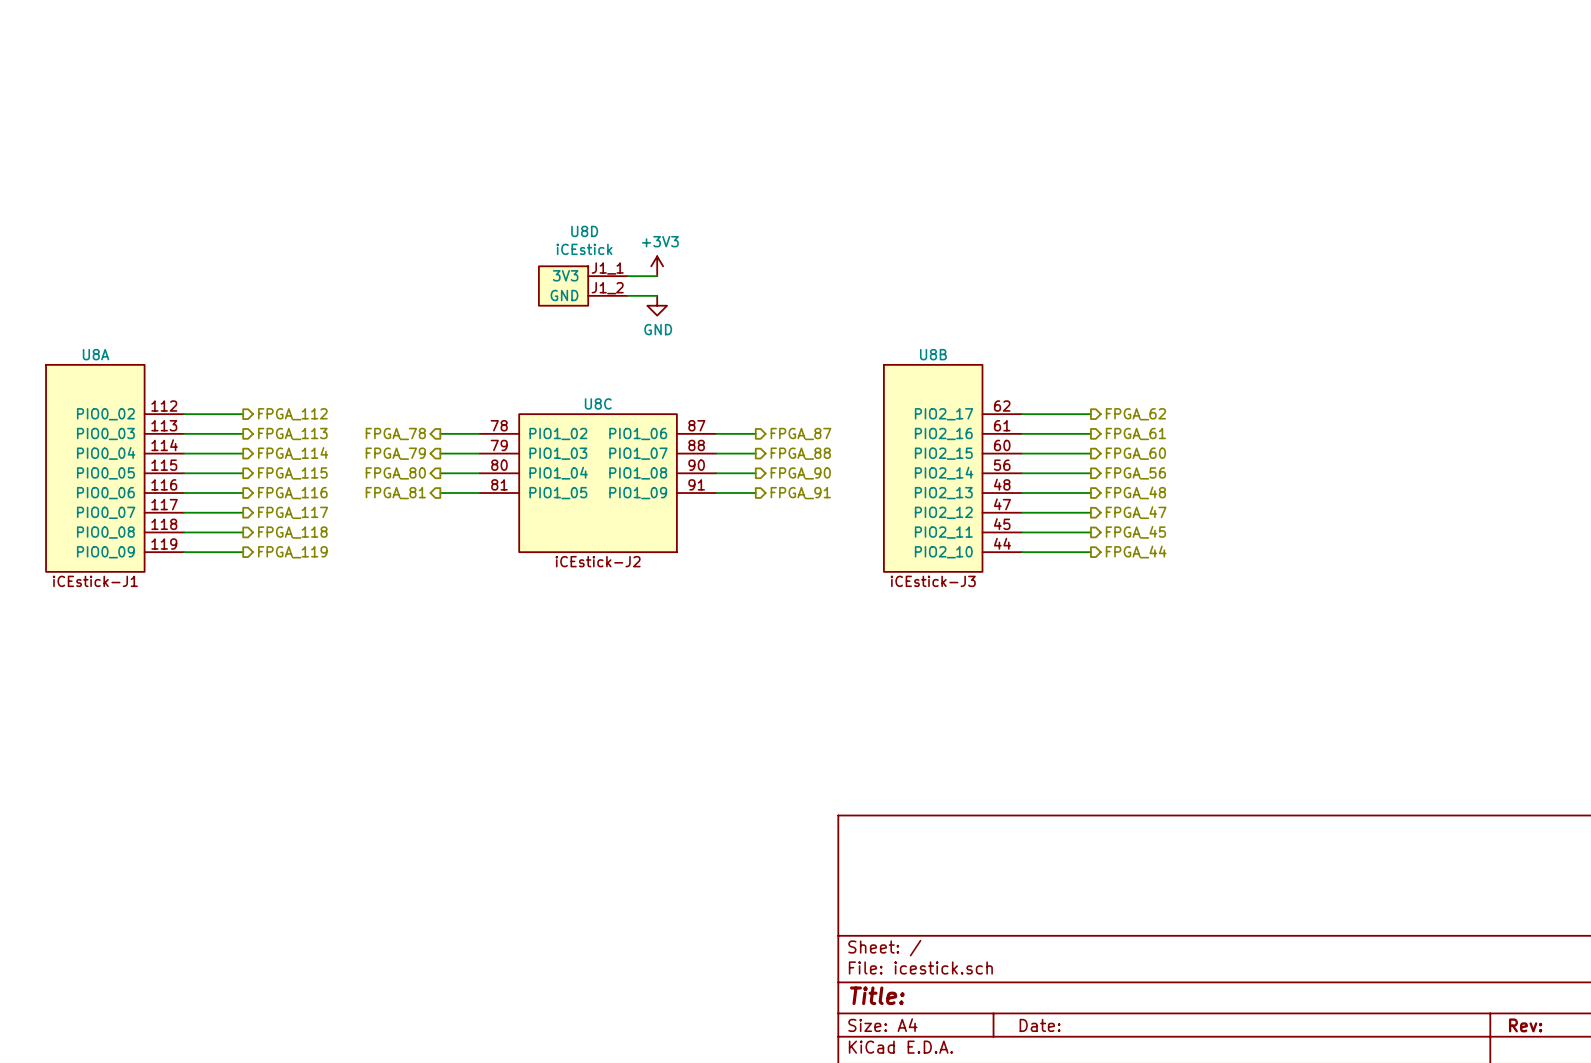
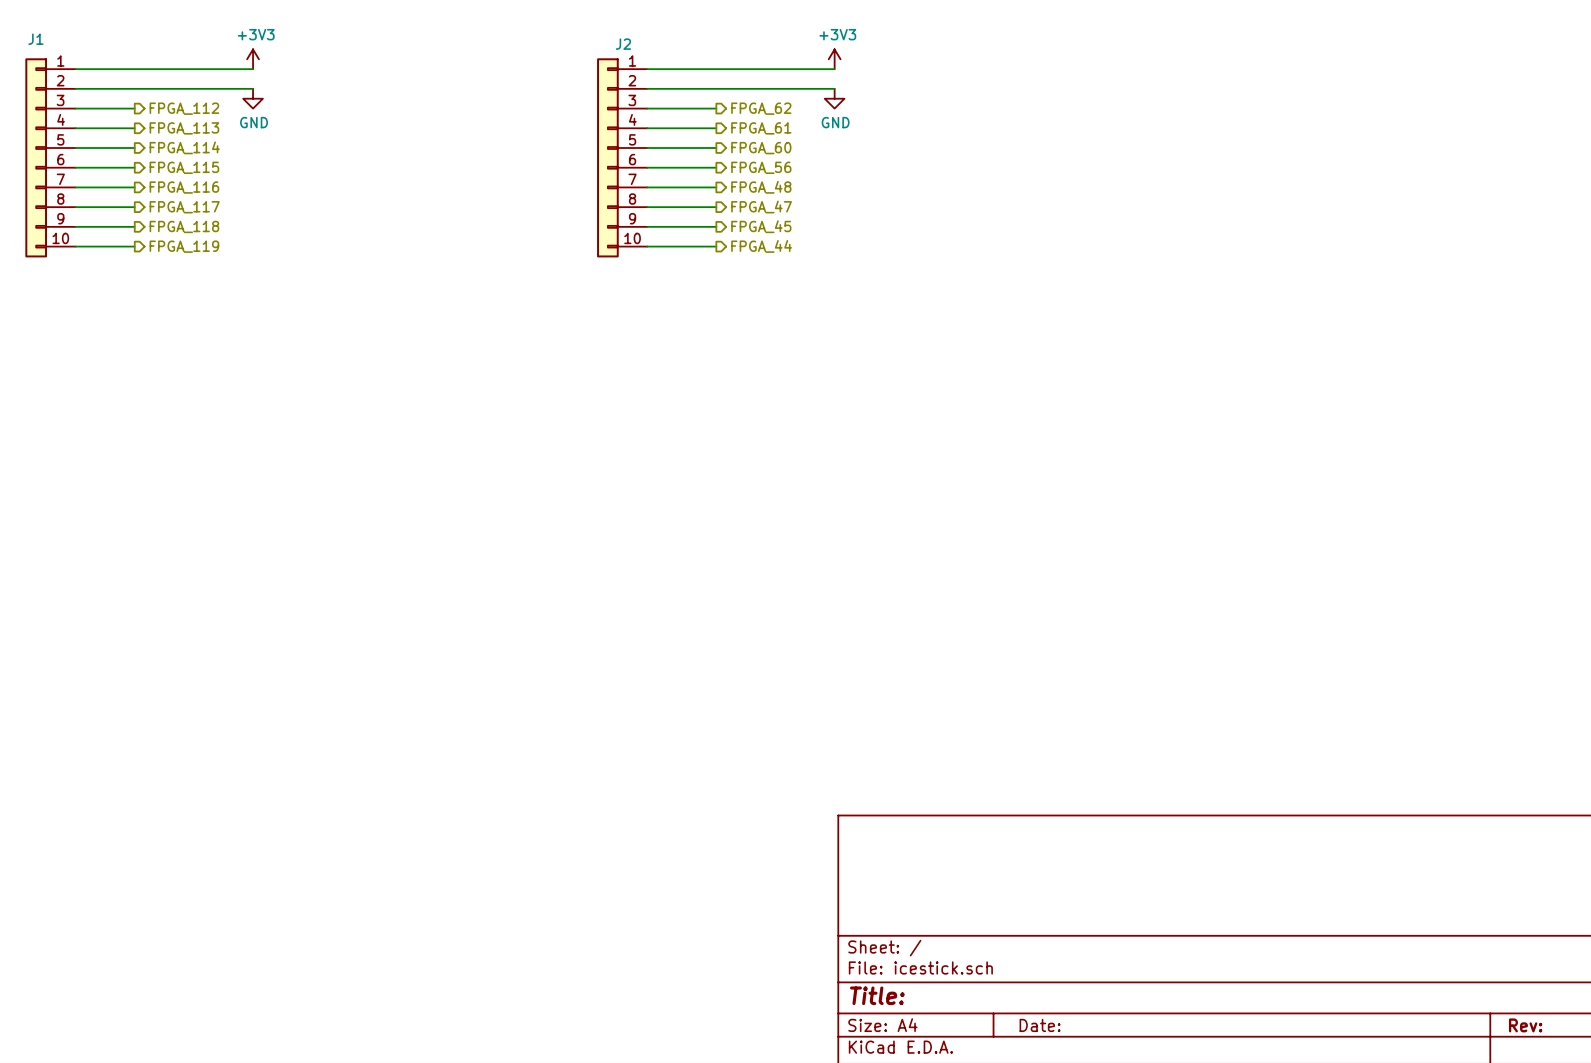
power symbol: none -> +3V3 (253, 59)
power symbol: none -> +3V3 (834, 59)
wire: none -> (75, 69) (253, 69)
wire: none -> (647, 69) (834, 69)
wire: none -> (75, 88) (253, 88)
wire: none -> (647, 88) (834, 88)
power symbol: none -> GND (253, 98)
power symbol: none -> GND (834, 98)
wire: none -> (75, 108) (134, 108)
hierarchical label: none -> FPGA_112 (184, 108)
wire: none -> (647, 108) (716, 108)
hierarchical label: none -> FPGA_62 (761, 108)
wire: none -> (75, 128) (134, 128)
hierarchical label: none -> FPGA_113 (184, 128)
wire: none -> (647, 128) (716, 128)
hierarchical label: none -> FPGA_61 (761, 128)
hierarchical label: none -> FPGA_114 (184, 147)
wire: none -> (75, 148) (134, 148)
wire: none -> (647, 148) (716, 148)
hierarchical label: none -> FPGA_60 (761, 148)
J1: none -> (50, 157)
J2: none -> (622, 157)
wire: none -> (75, 167) (134, 167)
hierarchical label: none -> FPGA_115 (184, 167)
wire: none -> (647, 167) (716, 167)
hierarchical label: none -> FPGA_56 (761, 167)
wire: none -> (75, 187) (134, 187)
hierarchical label: none -> FPGA_116 (184, 187)
wire: none -> (647, 187) (716, 187)
hierarchical label: none -> FPGA_48 (761, 187)
wire: none -> (75, 207) (134, 207)
hierarchical label: none -> FPGA_117 (184, 207)
wire: none -> (647, 207) (716, 207)
hierarchical label: none -> FPGA_47 (761, 207)
wire: none -> (75, 226) (134, 226)
hierarchical label: none -> FPGA_118 (184, 226)
wire: none -> (647, 226) (716, 226)
hierarchical label: none -> FPGA_45 (761, 226)
wire: none -> (75, 246) (134, 246)
hierarchical label: none -> FPGA_119 (184, 246)
wire: none -> (647, 246) (716, 246)
hierarchical label: none -> FPGA_44 (761, 246)
power symbol: +3V3 (657, 266) -> none
wire: (627, 276) (657, 276) -> none
U8D: iCEstick (583, 286) -> none
wire: (627, 295) (657, 295) -> none
power symbol: GND (657, 305) -> none
wire: (184, 414) (243, 414) -> none
hierarchical label: FPGA_112 (292, 414) -> none
wire: (1021, 414) (1090, 414) -> none
hierarchical label: FPGA_62 (1135, 414) -> none
wire: (184, 433) (243, 433) -> none
hierarchical label: FPGA_113 (292, 433) -> none
hierarchical label: FPGA_78 (395, 433) -> none
wire: (440, 433) (479, 433) -> none
wire: (716, 433) (755, 433) -> none
hierarchical label: FPGA_87 (800, 433) -> none
wire: (1021, 433) (1090, 433) -> none
hierarchical label: FPGA_61 (1135, 433) -> none
wire: (184, 453) (243, 453) -> none
hierarchical label: FPGA_114 (293, 453) -> none
hierarchical label: FPGA_79 (395, 453) -> none
wire: (440, 453) (479, 453) -> none
wire: (716, 453) (755, 453) -> none
hierarchical label: FPGA_88 (800, 453) -> none
wire: (1021, 453) (1090, 453) -> none
hierarchical label: FPGA_60 (1135, 453) -> none
U8A: (115, 468) -> none
U8B: (952, 468) -> none
wire: (184, 473) (243, 473) -> none
hierarchical label: FPGA_115 (292, 473) -> none
hierarchical label: FPGA_80 (395, 473) -> none
wire: (440, 473) (479, 473) -> none
wire: (716, 473) (755, 473) -> none
hierarchical label: FPGA_90 (800, 473) -> none
wire: (1021, 473) (1090, 473) -> none
hierarchical label: FPGA_56 (1135, 473) -> none
U8C: (598, 483) -> none
hierarchical label: FPGA_48 (1135, 492) -> none
wire: (184, 493) (243, 493) -> none
hierarchical label: FPGA_116 (292, 493) -> none
hierarchical label: FPGA_81 (395, 493) -> none
wire: (440, 493) (479, 493) -> none
wire: (716, 493) (755, 493) -> none
hierarchical label: FPGA_91 (800, 493) -> none
wire: (1021, 493) (1090, 493) -> none
wire: (184, 512) (243, 512) -> none
hierarchical label: FPGA_117 (293, 512) -> none
wire: (1021, 512) (1090, 512) -> none
hierarchical label: FPGA_47 (1136, 512) -> none
wire: (184, 532) (243, 532) -> none
hierarchical label: FPGA_118 (292, 532) -> none
wire: (1021, 532) (1090, 532) -> none
hierarchical label: FPGA_45 (1135, 532) -> none
wire: (184, 552) (243, 552) -> none
hierarchical label: FPGA_119 (292, 552) -> none
wire: (1021, 552) (1090, 552) -> none
hierarchical label: FPGA_44 (1136, 552) -> none

